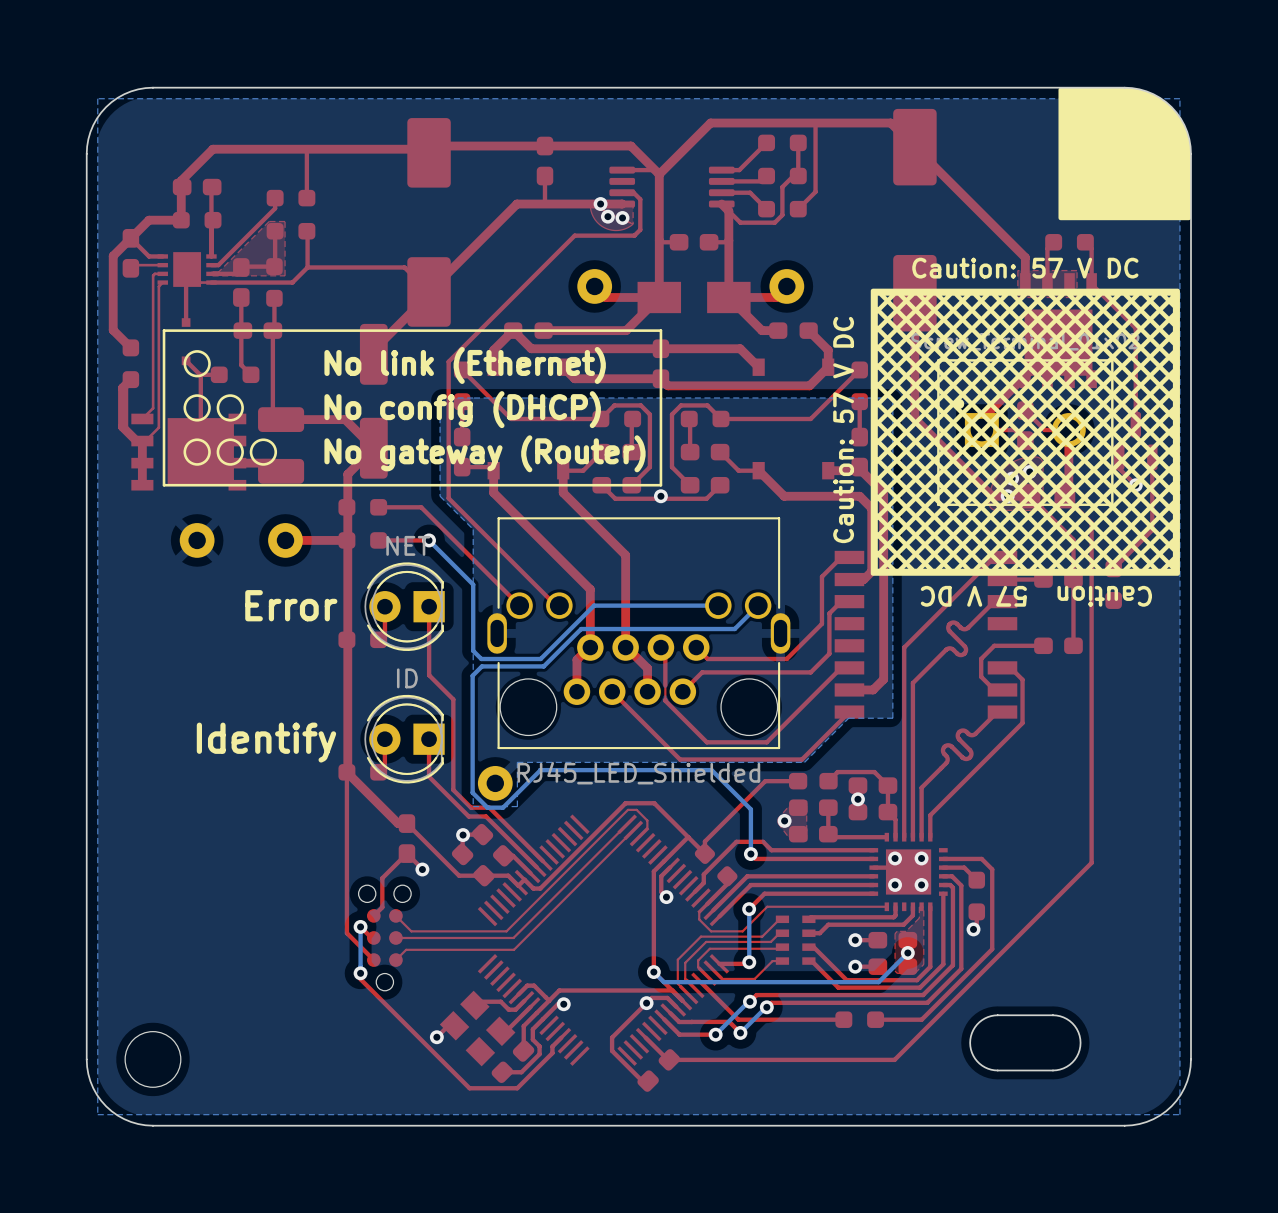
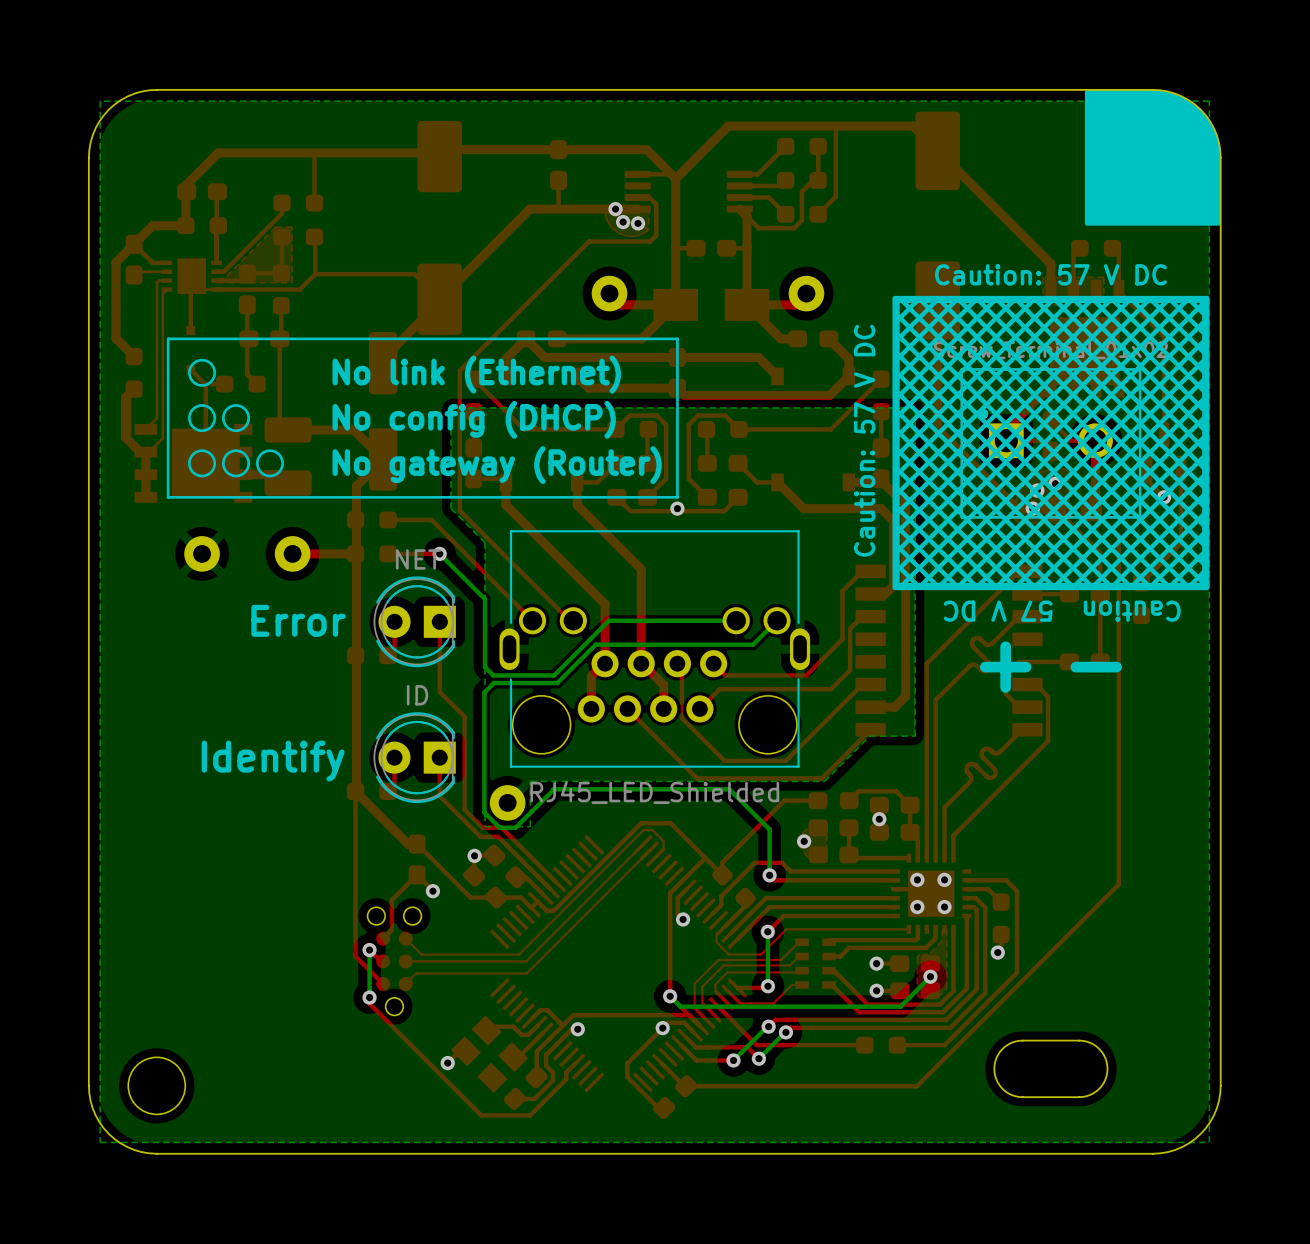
line: none -> (1005, 646) (1005, 687)
line: none -> (1026, 667) (985, 667)
line: none -> (1116, 667) (1075, 667)

